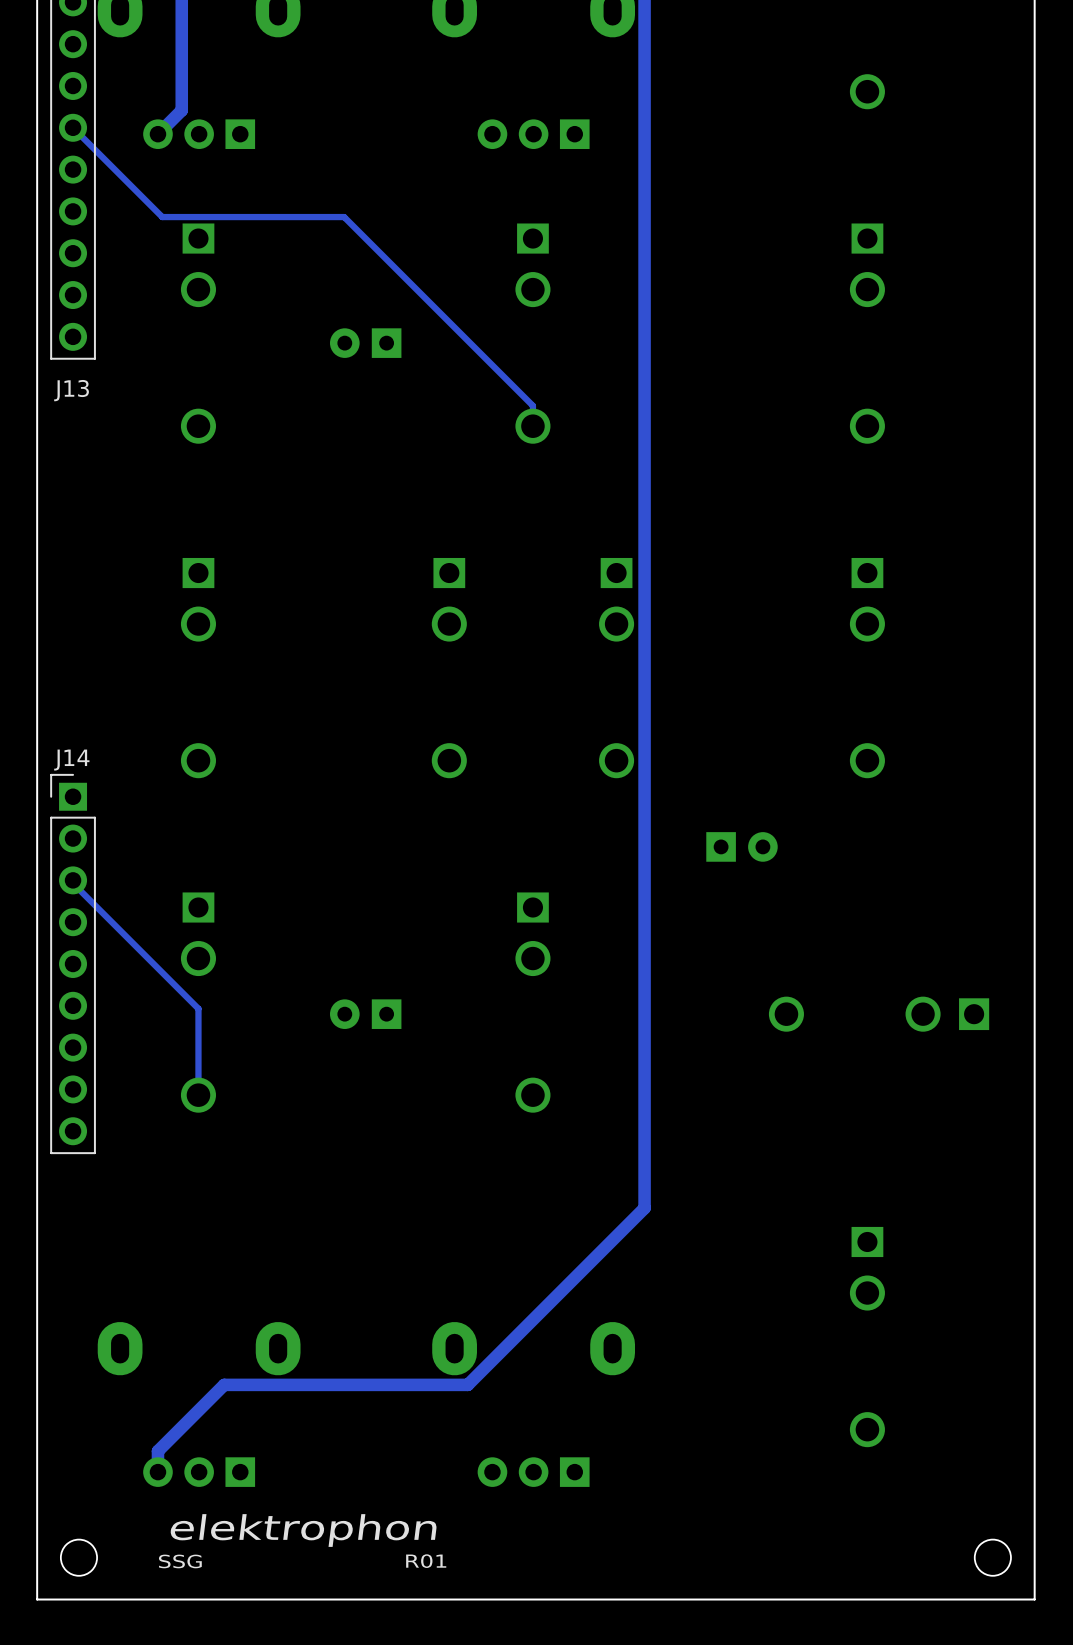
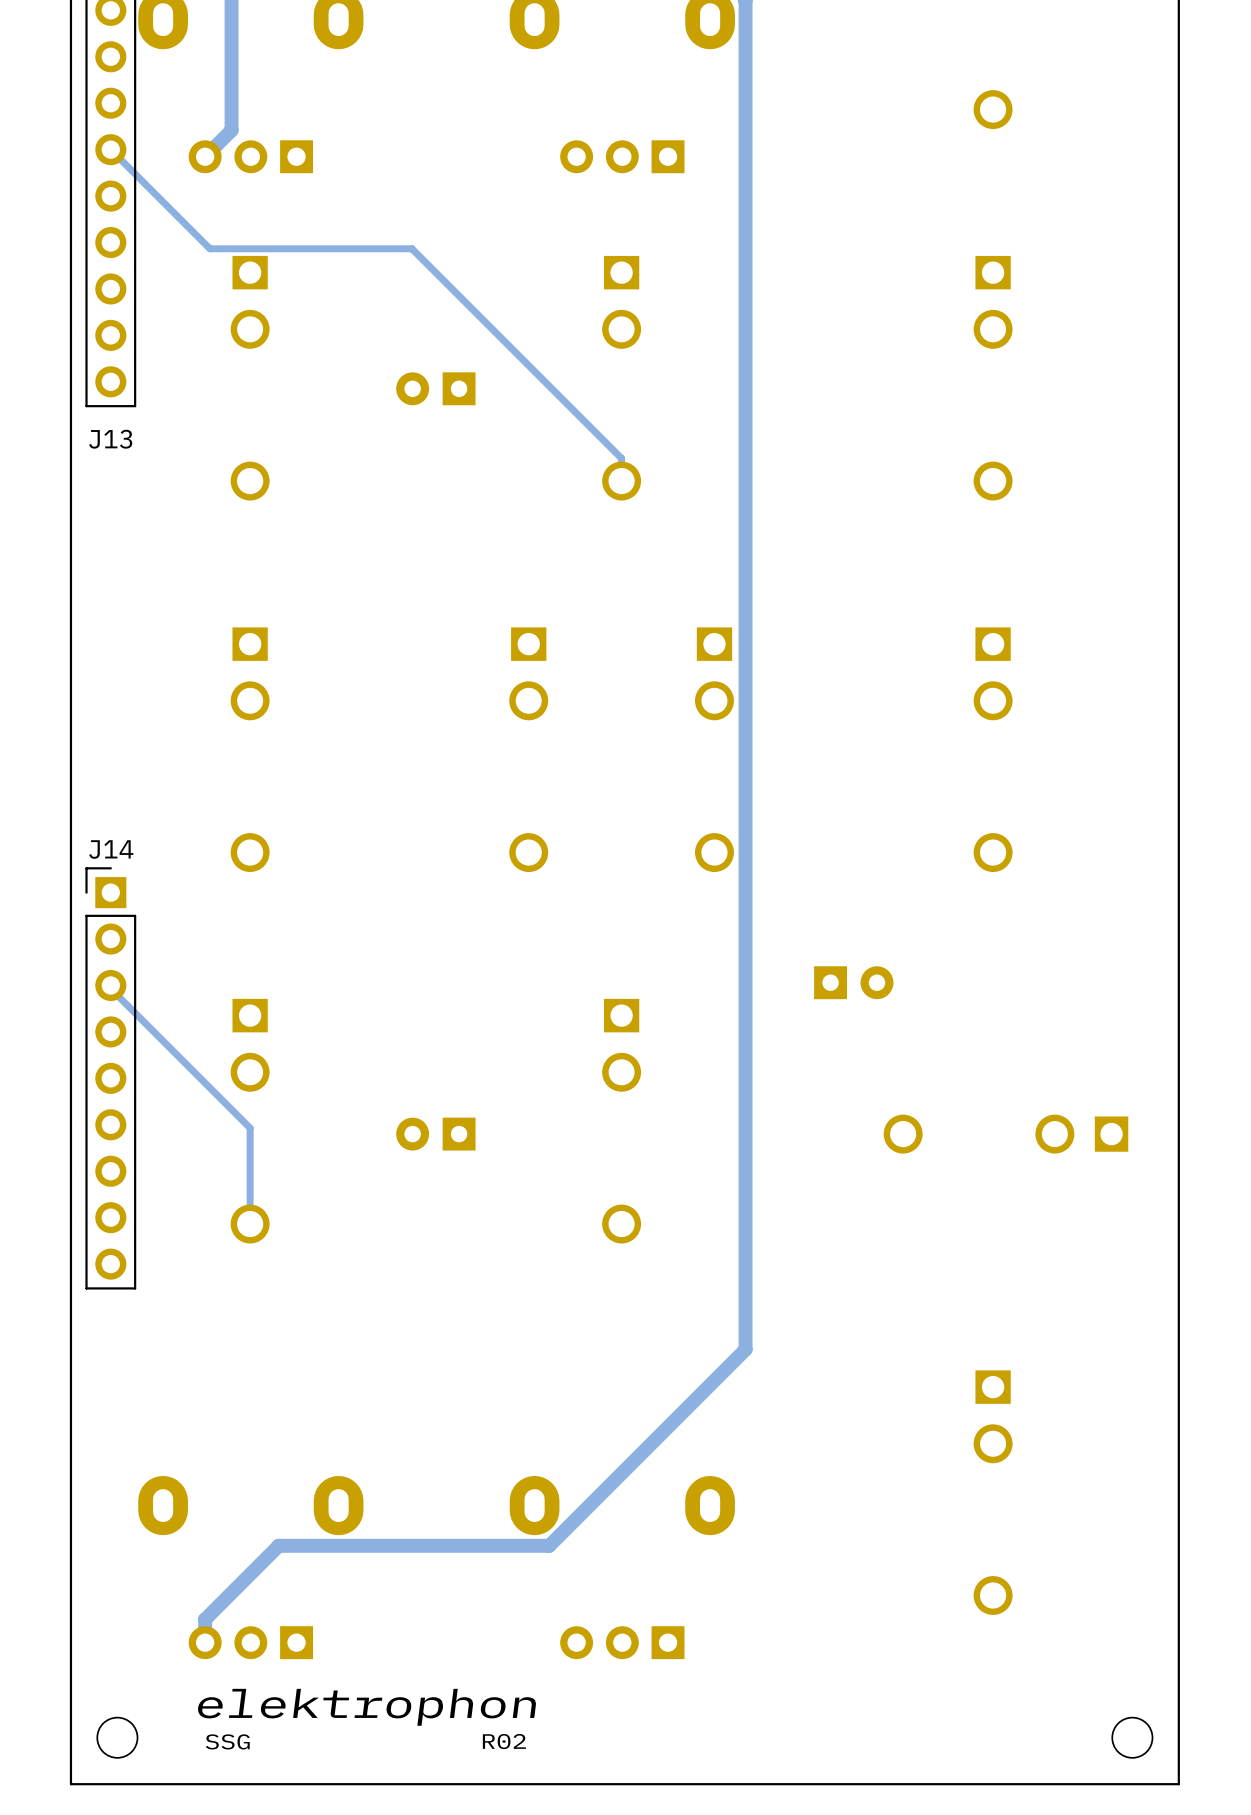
part position: (742, 846) -> (853, 982)
drawing shape: [158, 1514, 447, 1569] -> [197, 1688, 537, 1750]

